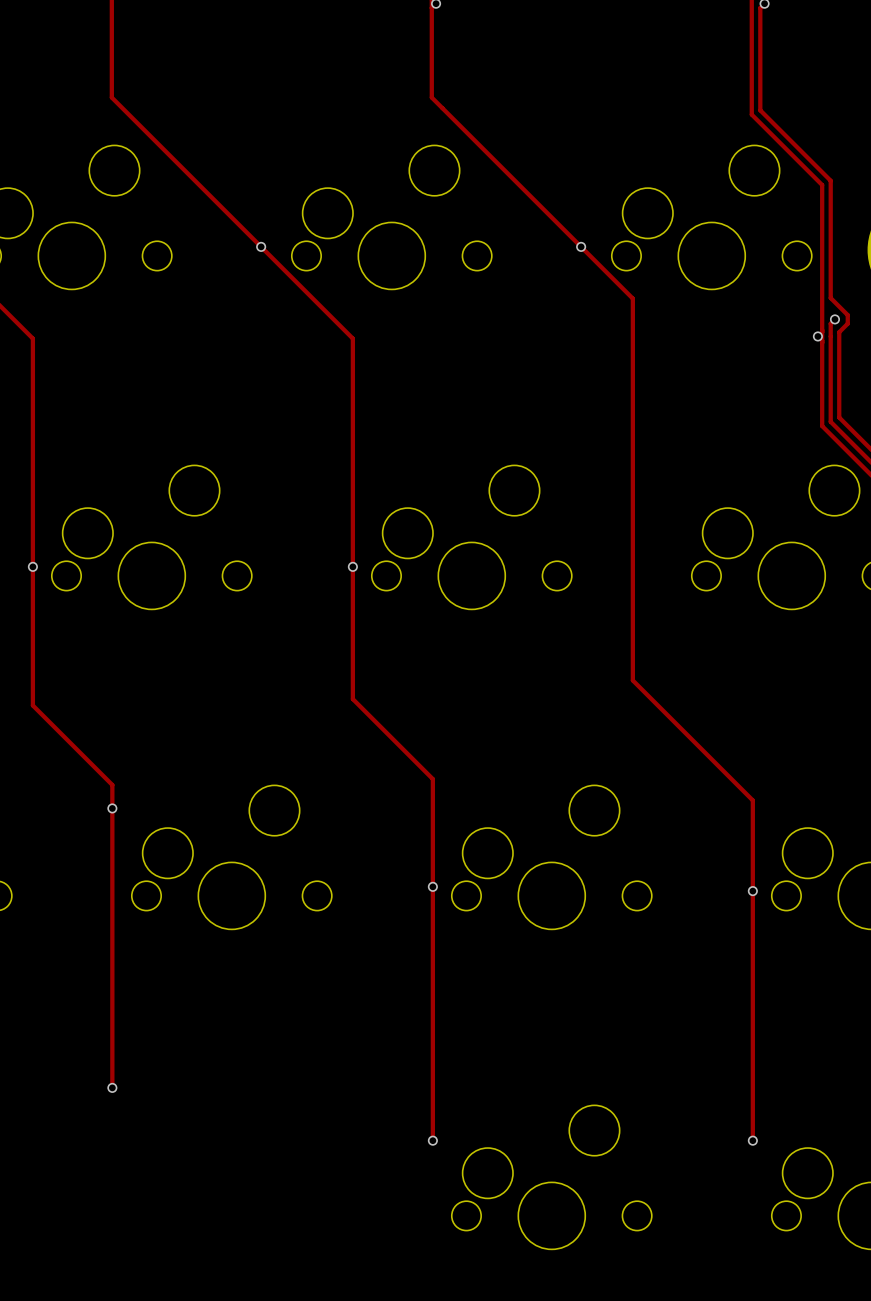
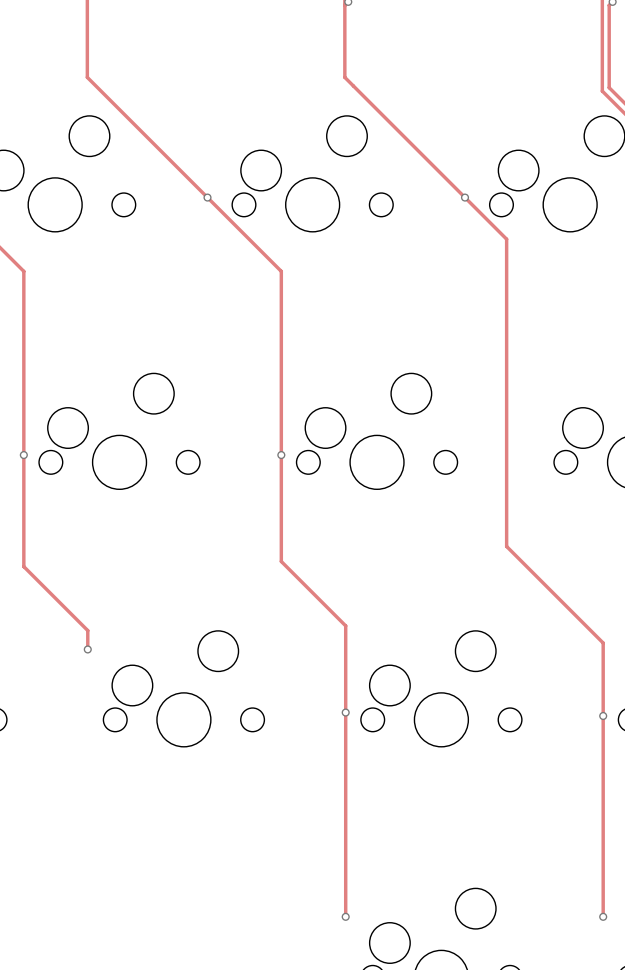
track: (112, 808) (112, 1087) (113, 1089) -> none
via: (112, 1087) -> none

